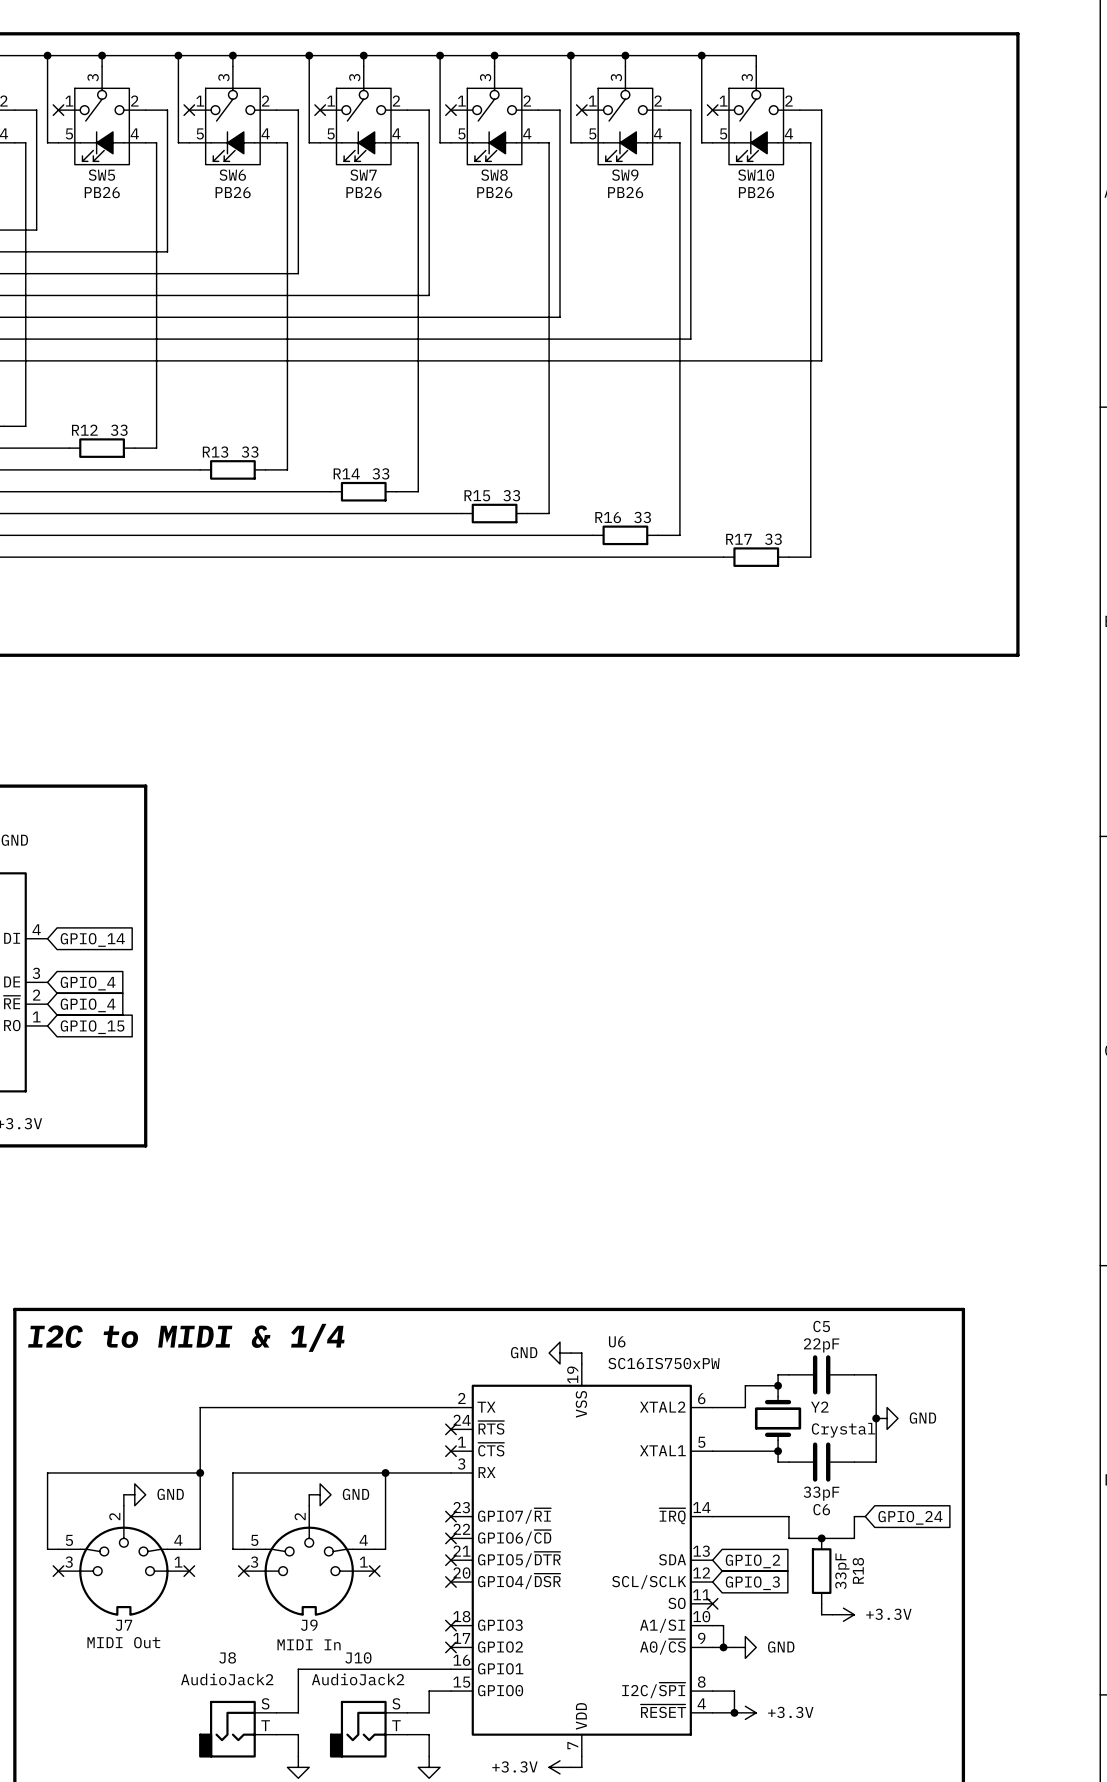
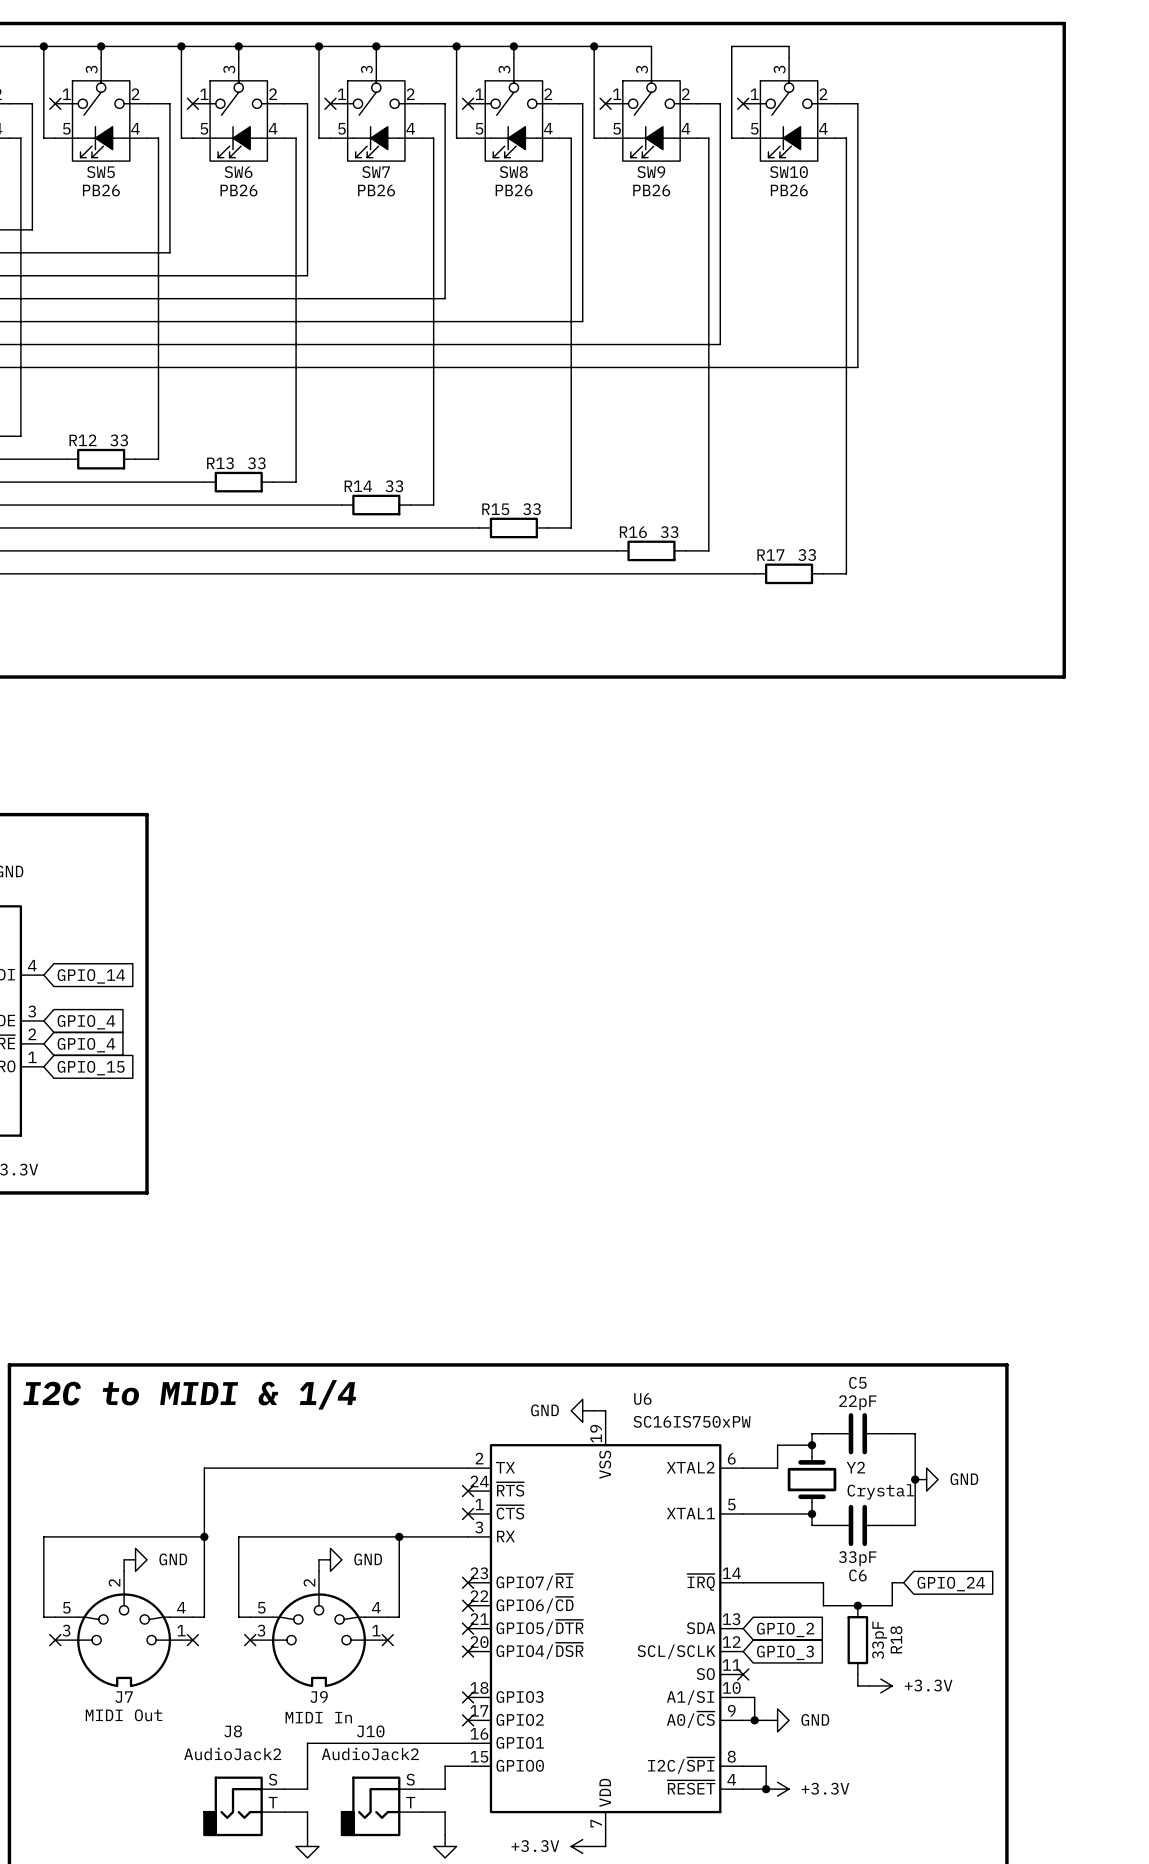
wire: (625, 55) (701, 55) -> none
junction: (625, 55) -> none
junction: (701, 55) -> none

